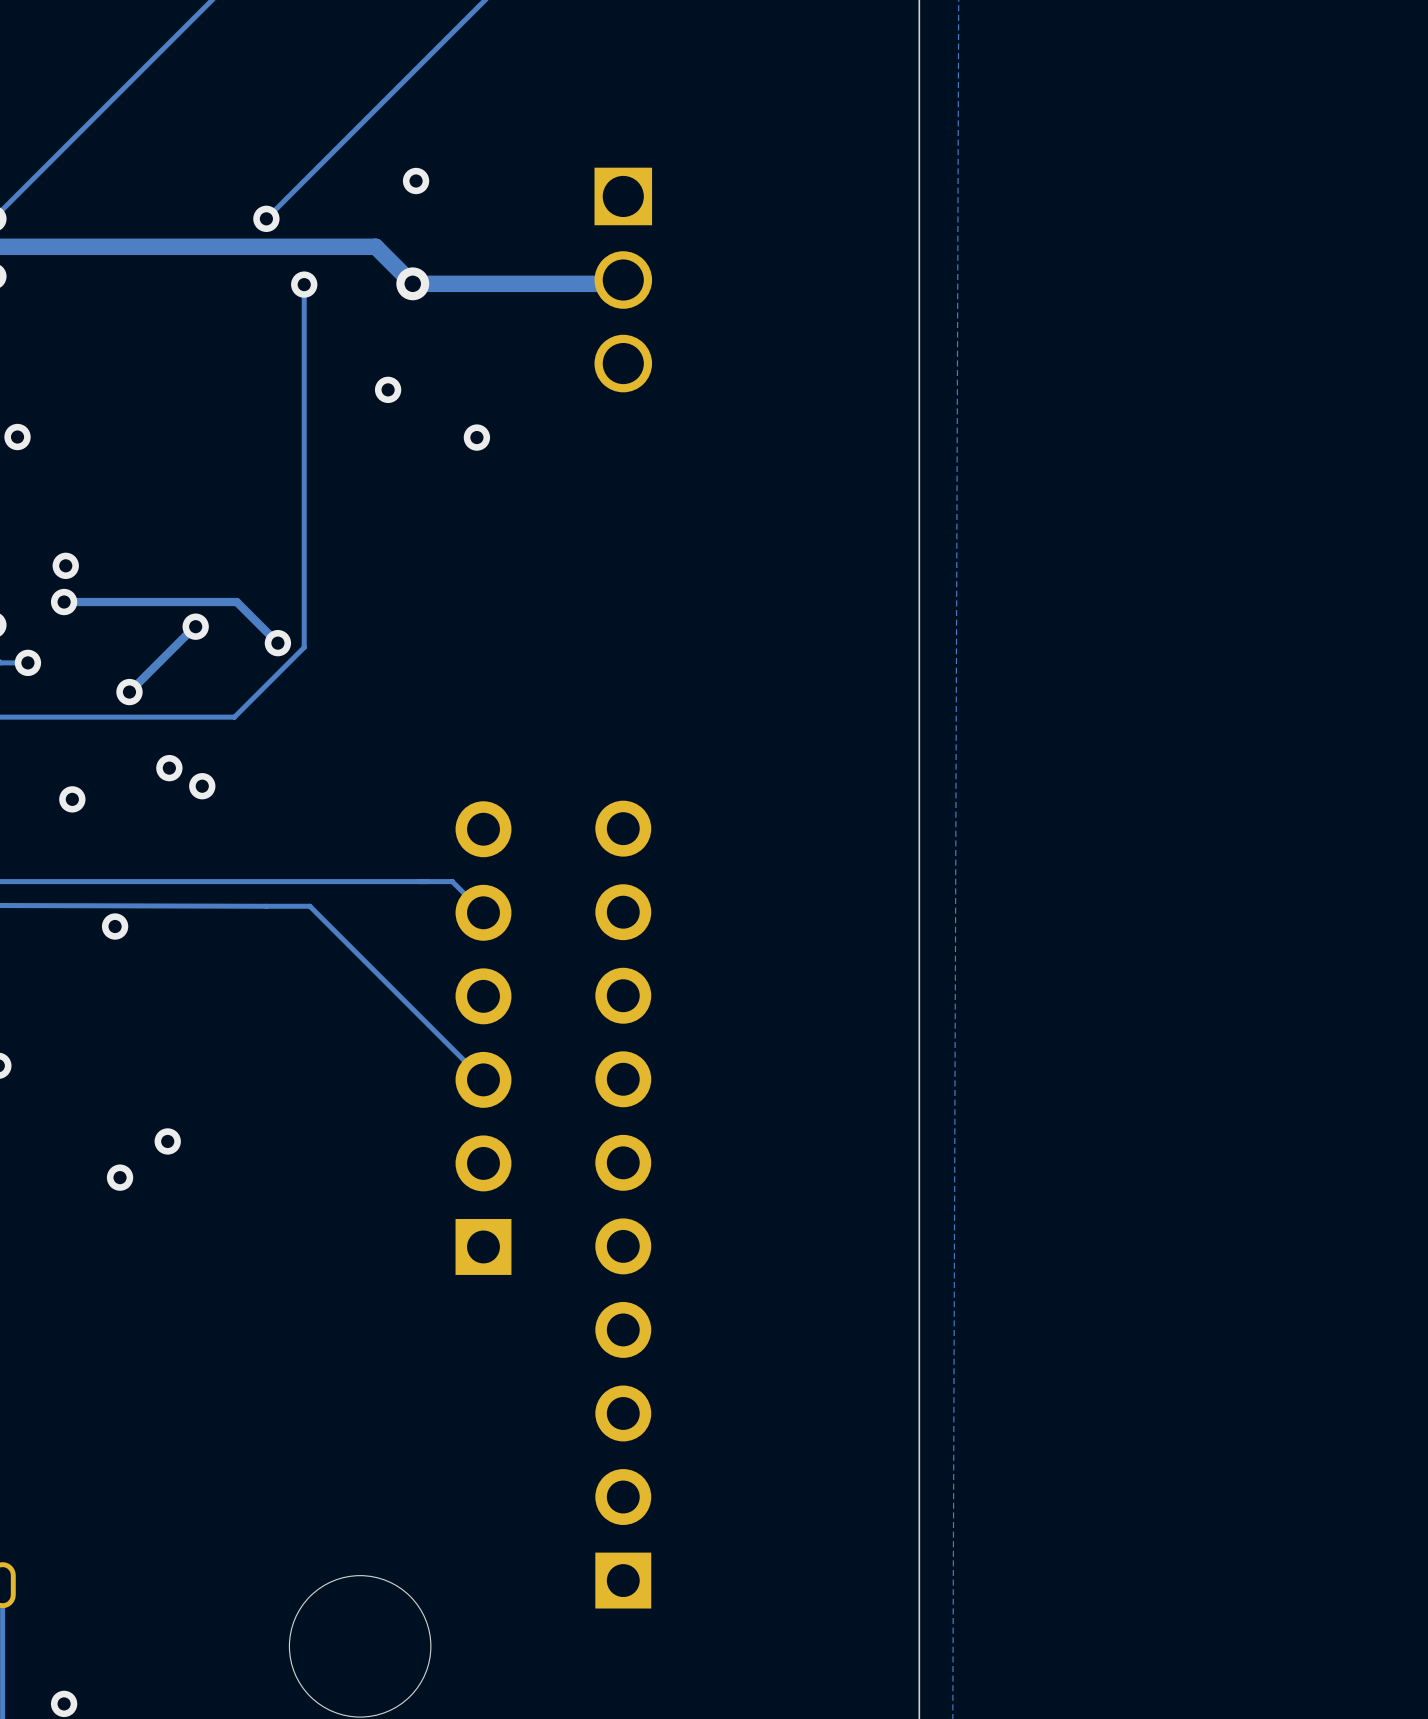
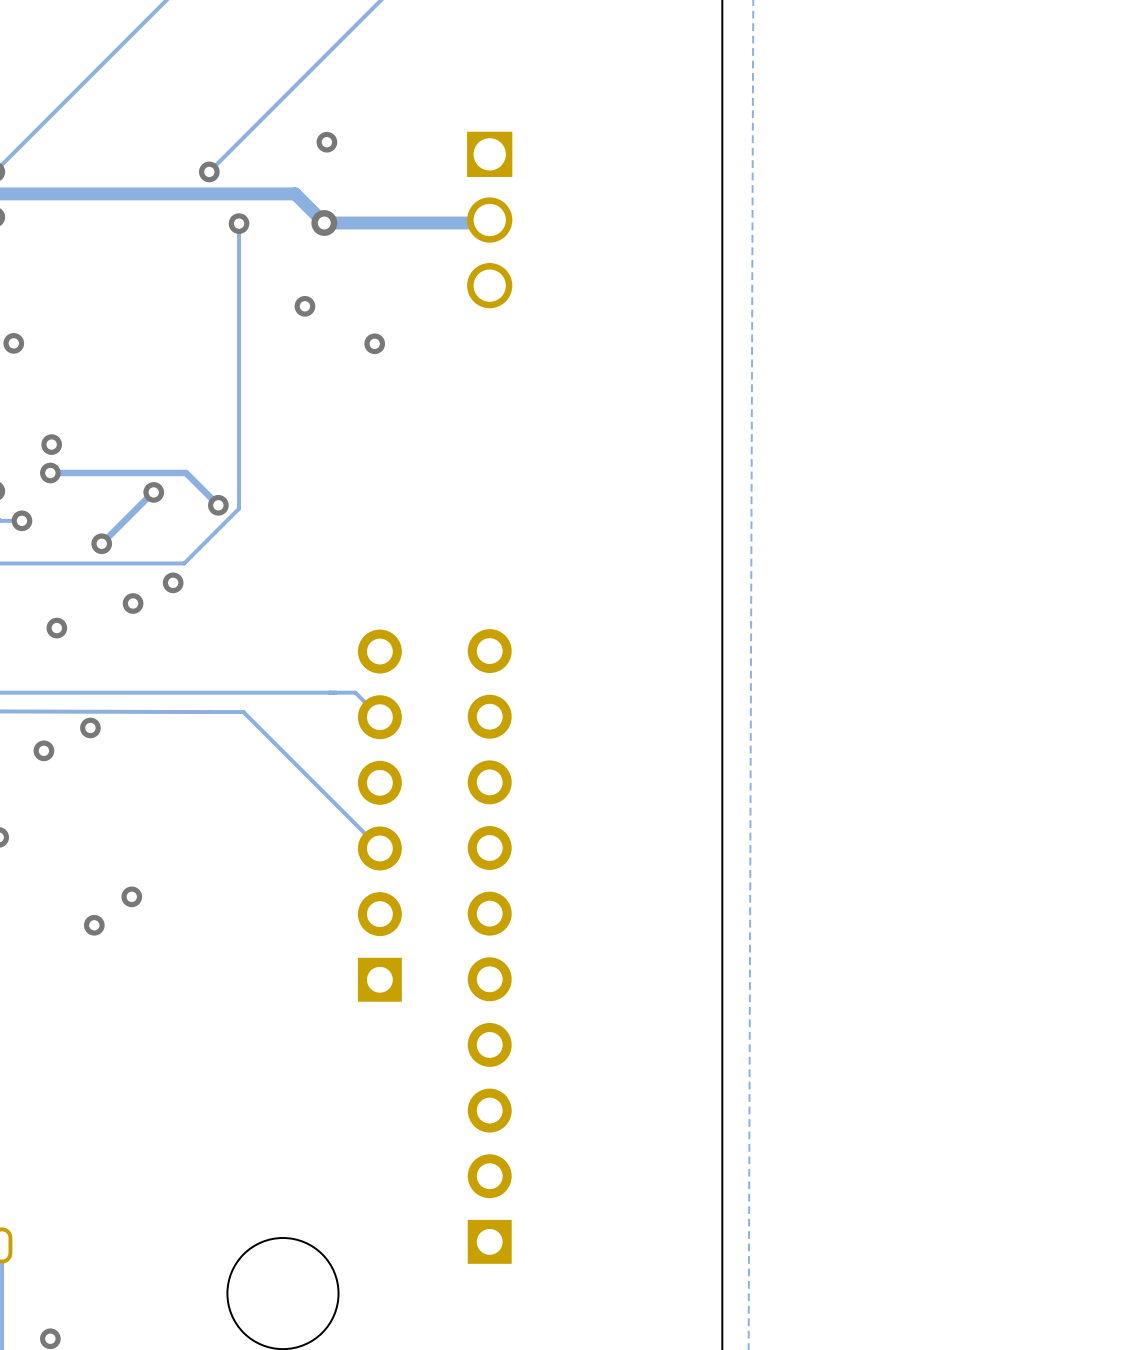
via position: (202, 786) -> (173, 582)
via: none -> (43, 750)

